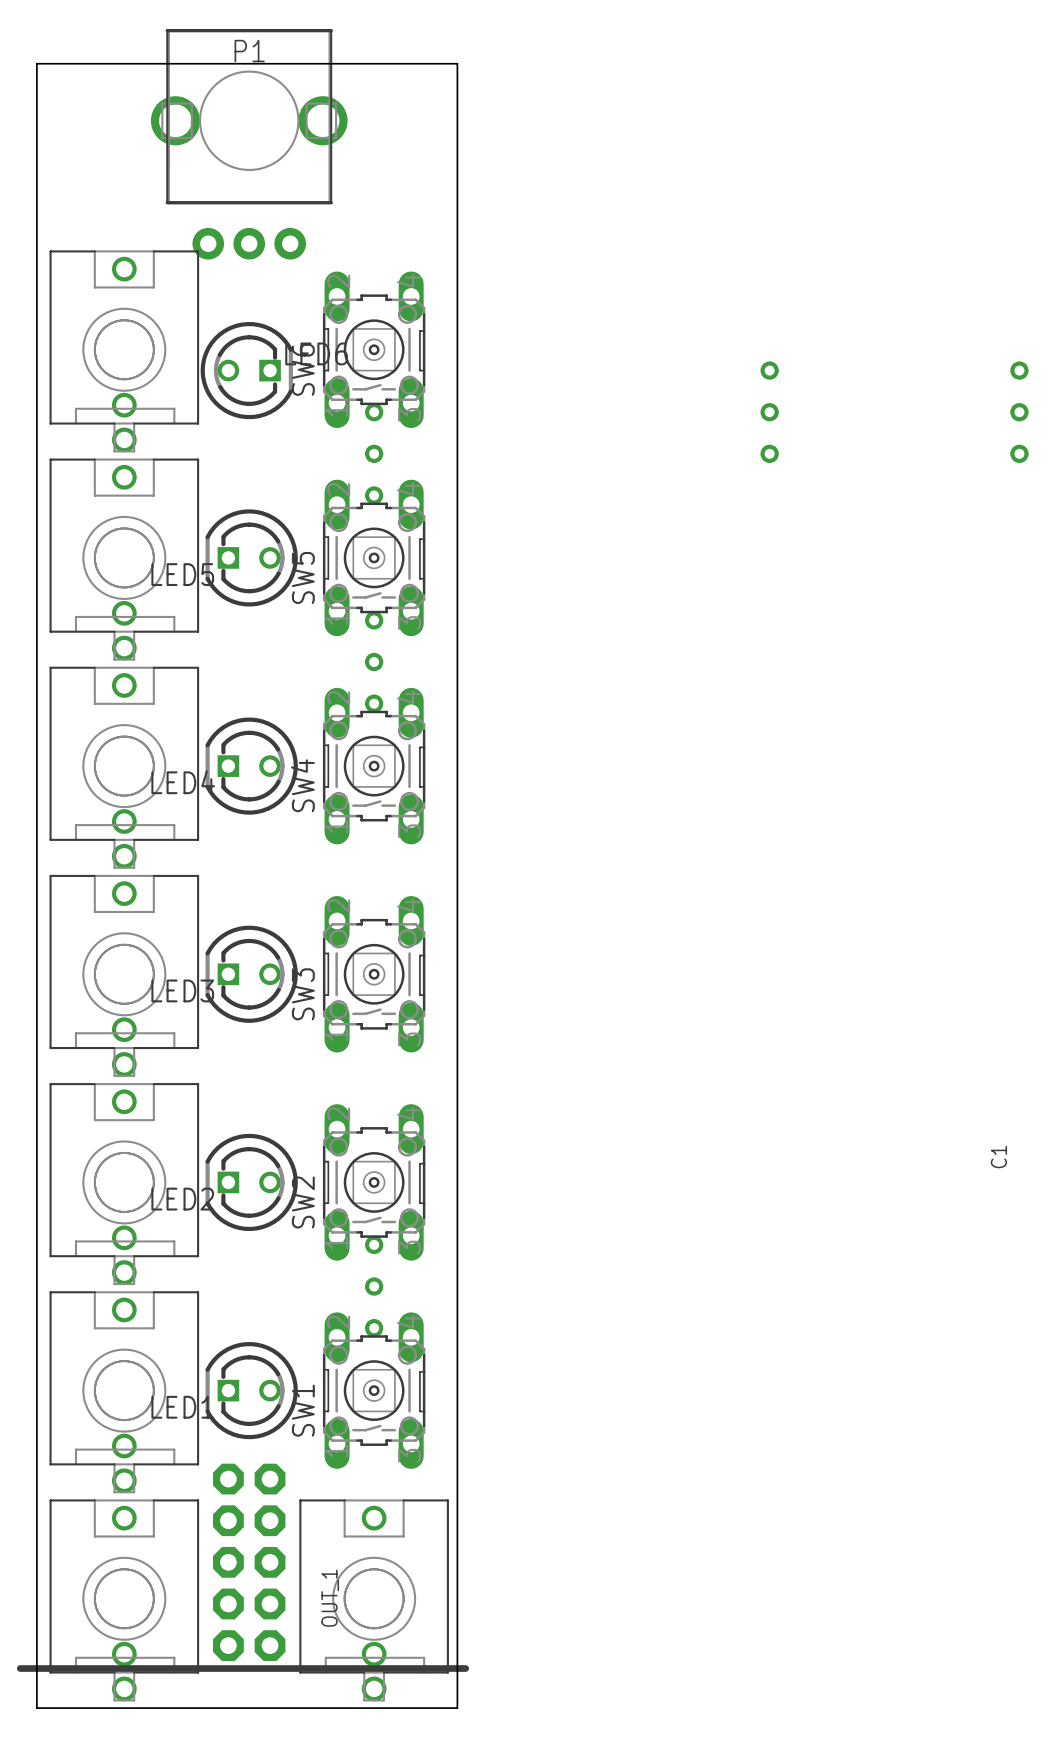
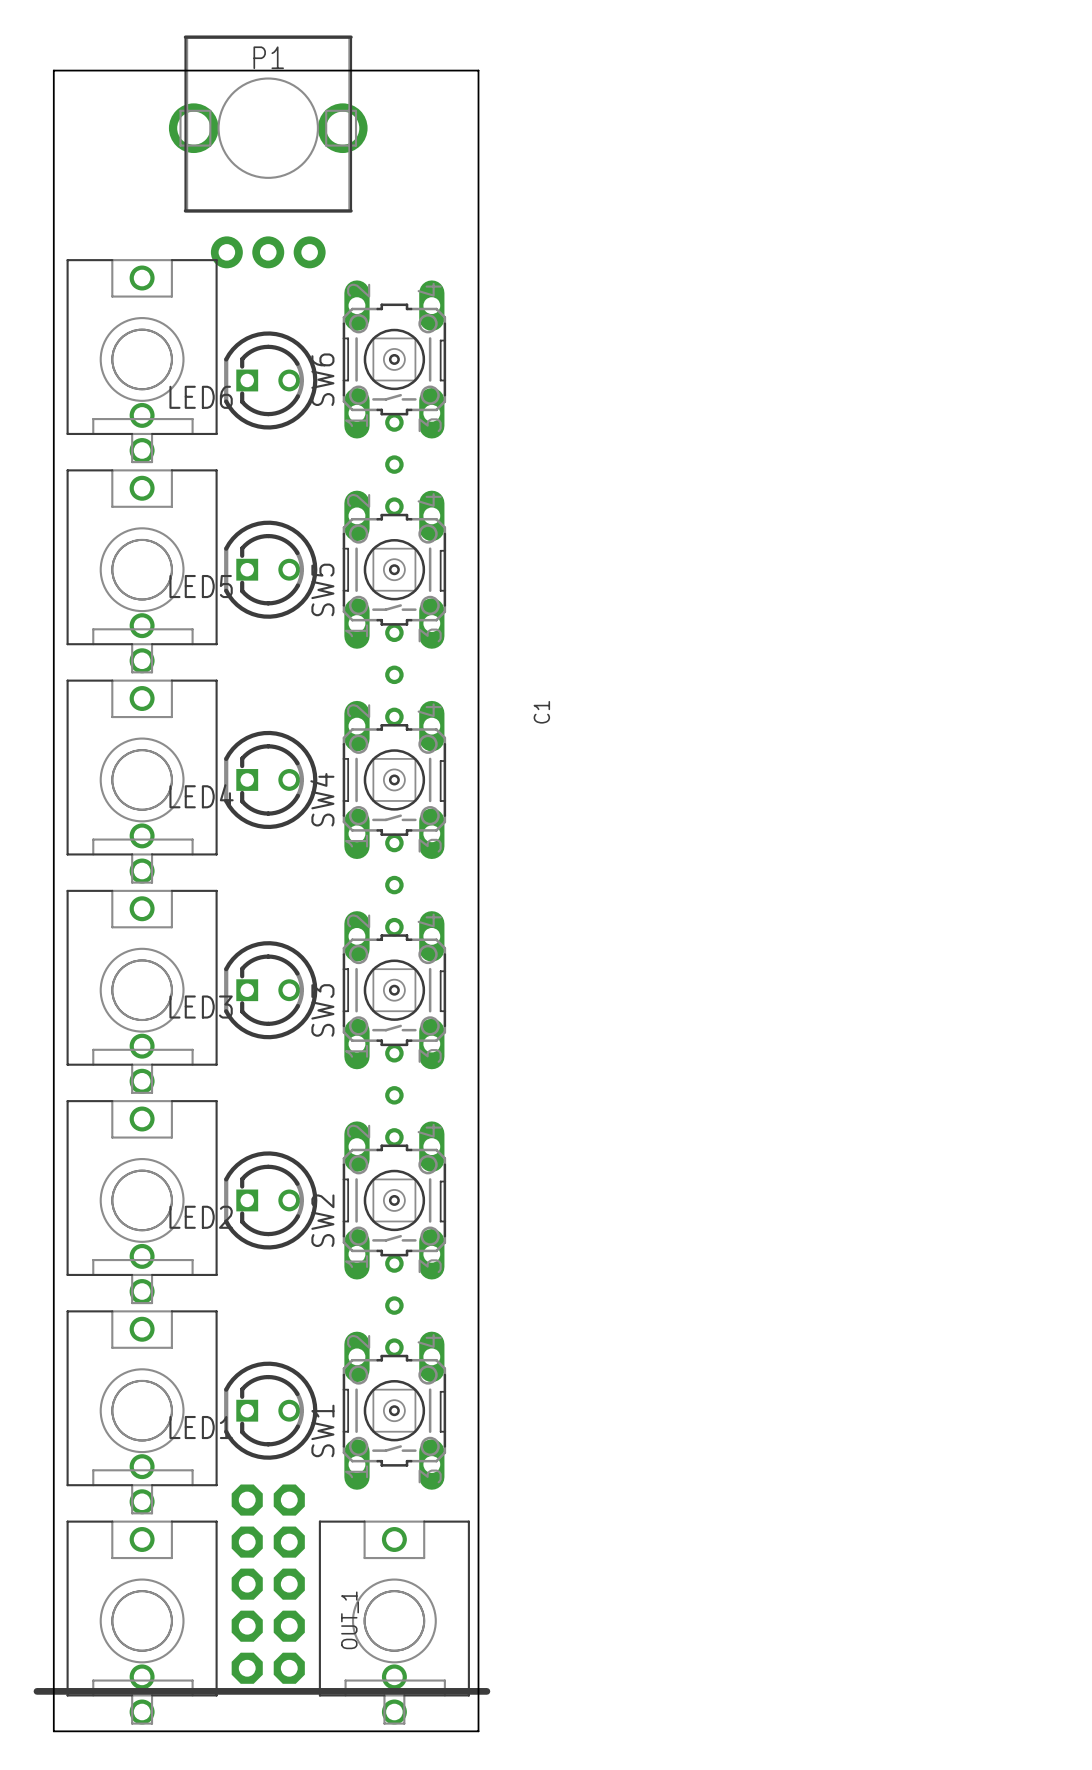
LED6 rotation: 0° (246, 370) -> 180° (270, 380)
part: (769, 412) -> none
part: (1019, 412) -> none
part: none -> (394, 885)
part: none -> (394, 1095)
C1 position: (998, 1157) -> (541, 712)

